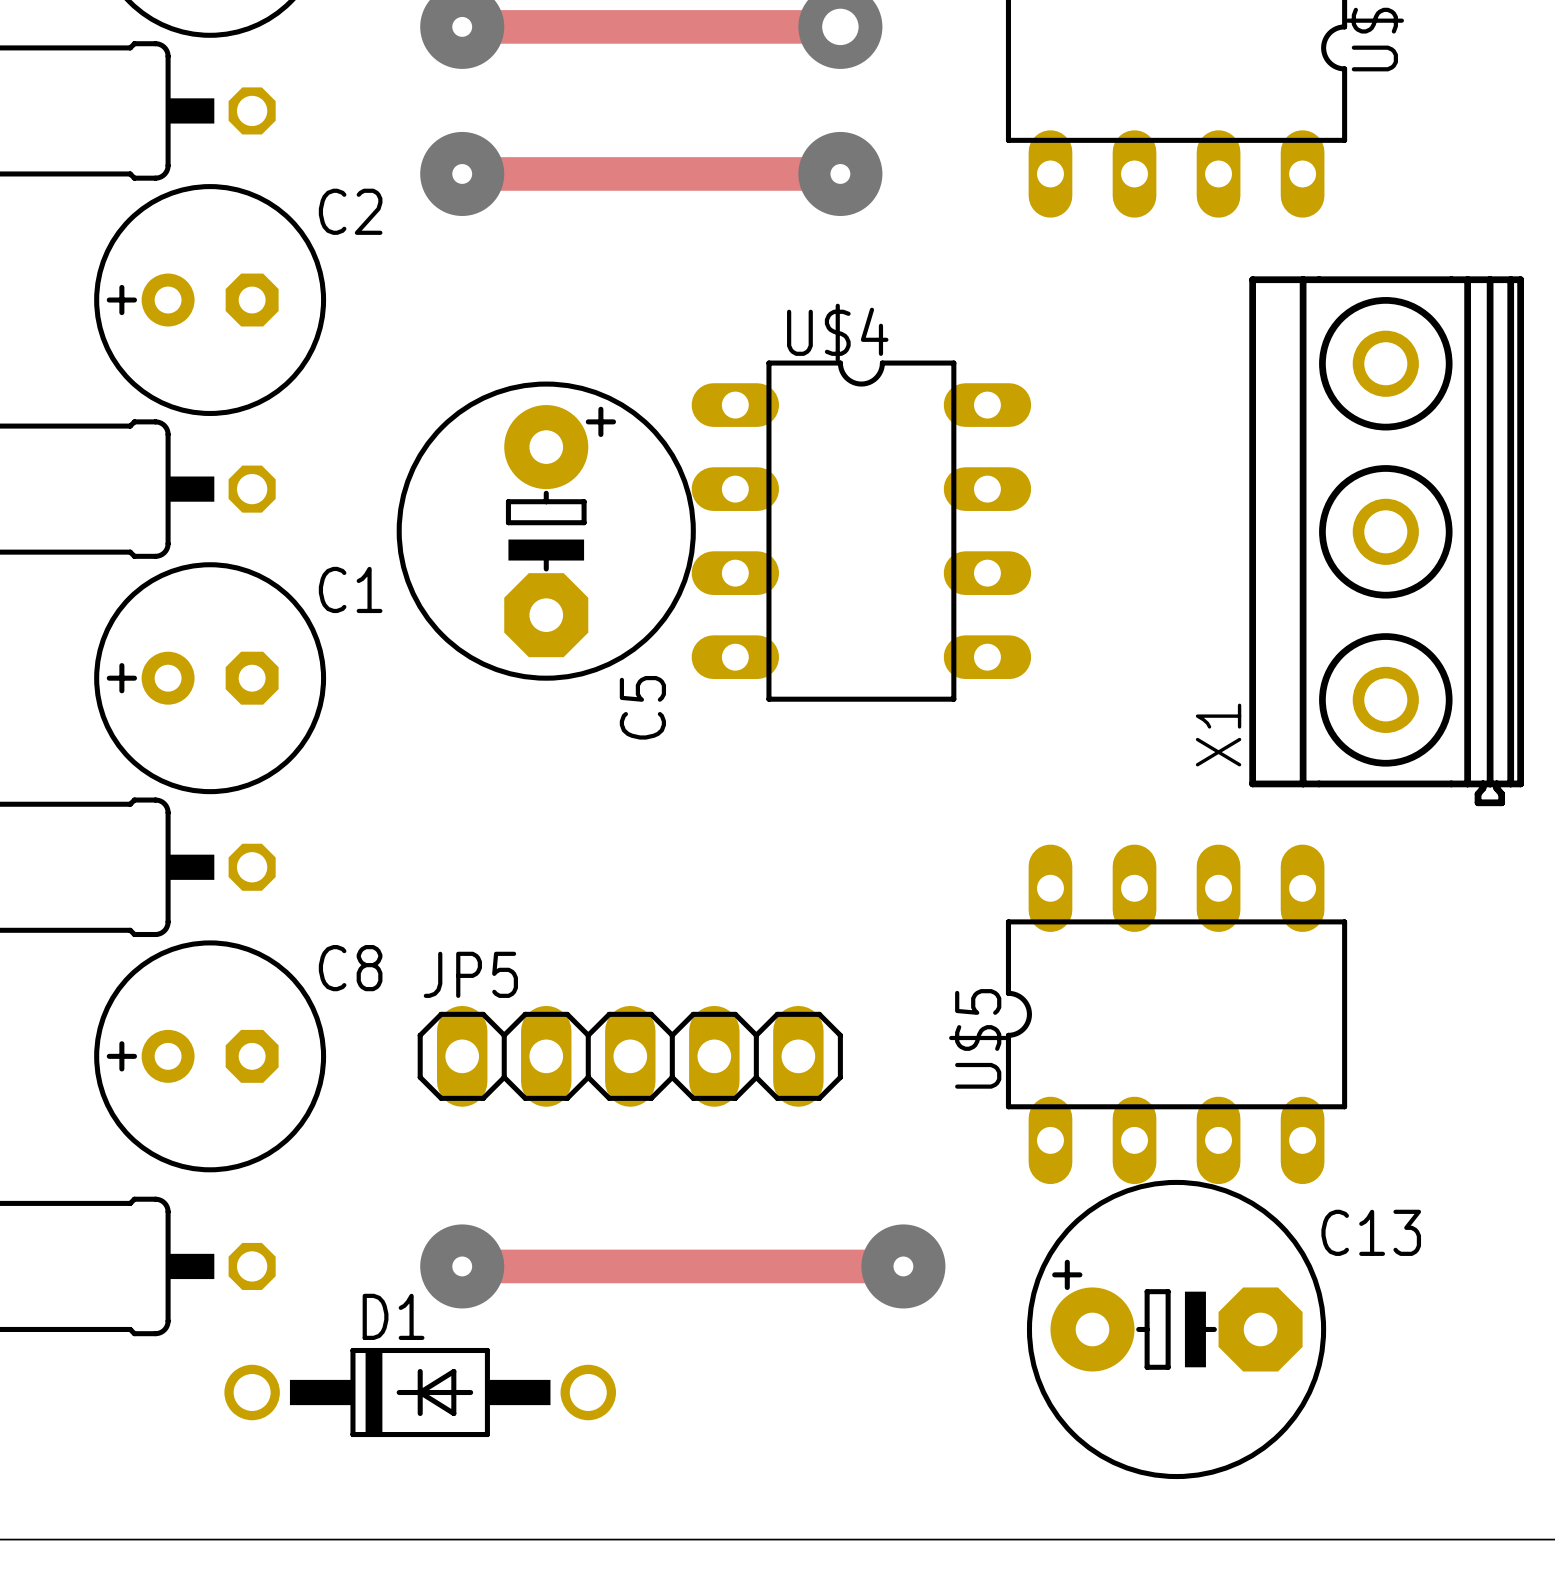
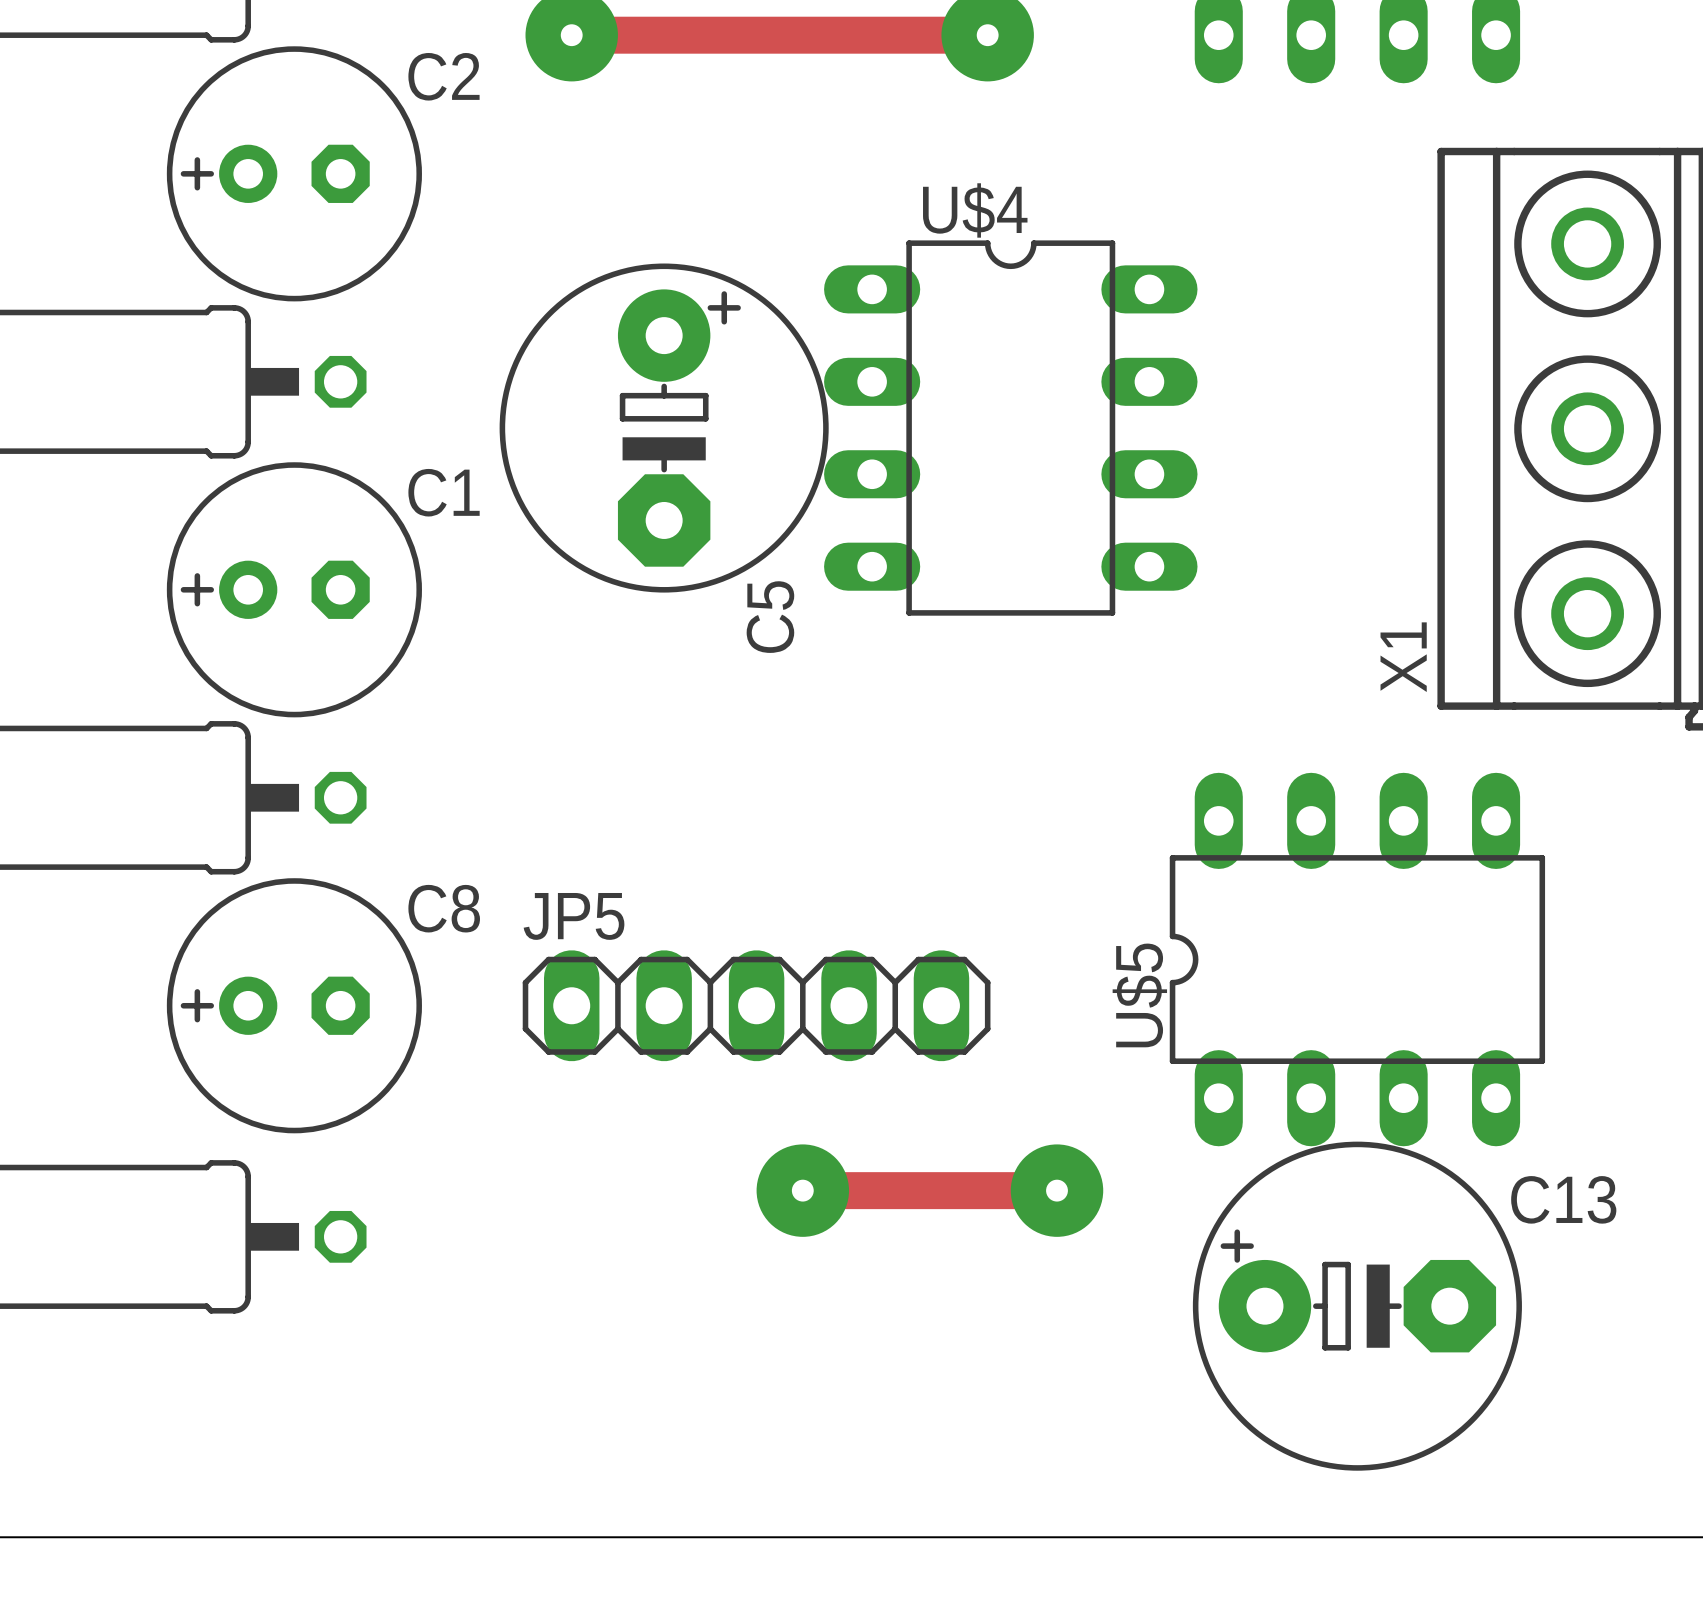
track: none -> (802, 1190) (1057, 1190)
via: none -> (802, 1190)
track: (462, 1266) (903, 1266) -> none
via: (462, 1266) -> none
via position: (903, 1266) -> (1057, 1190)
D1: (420, 1392) -> none

